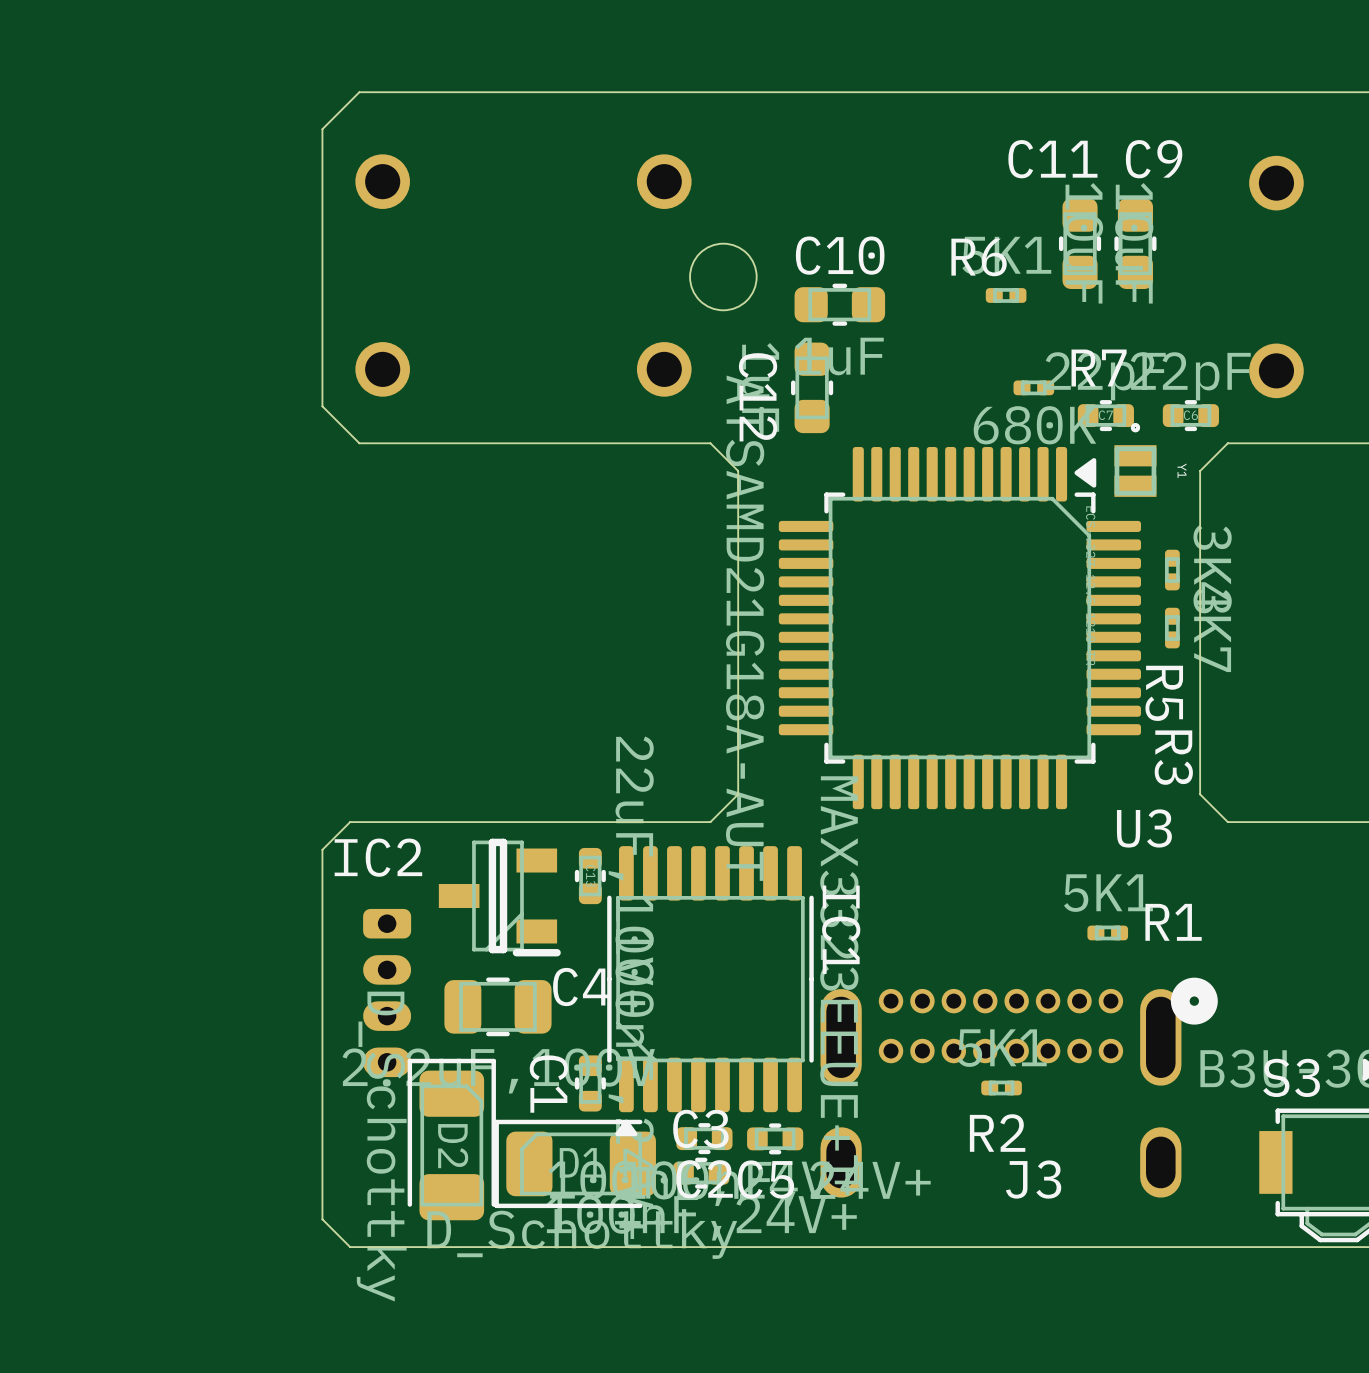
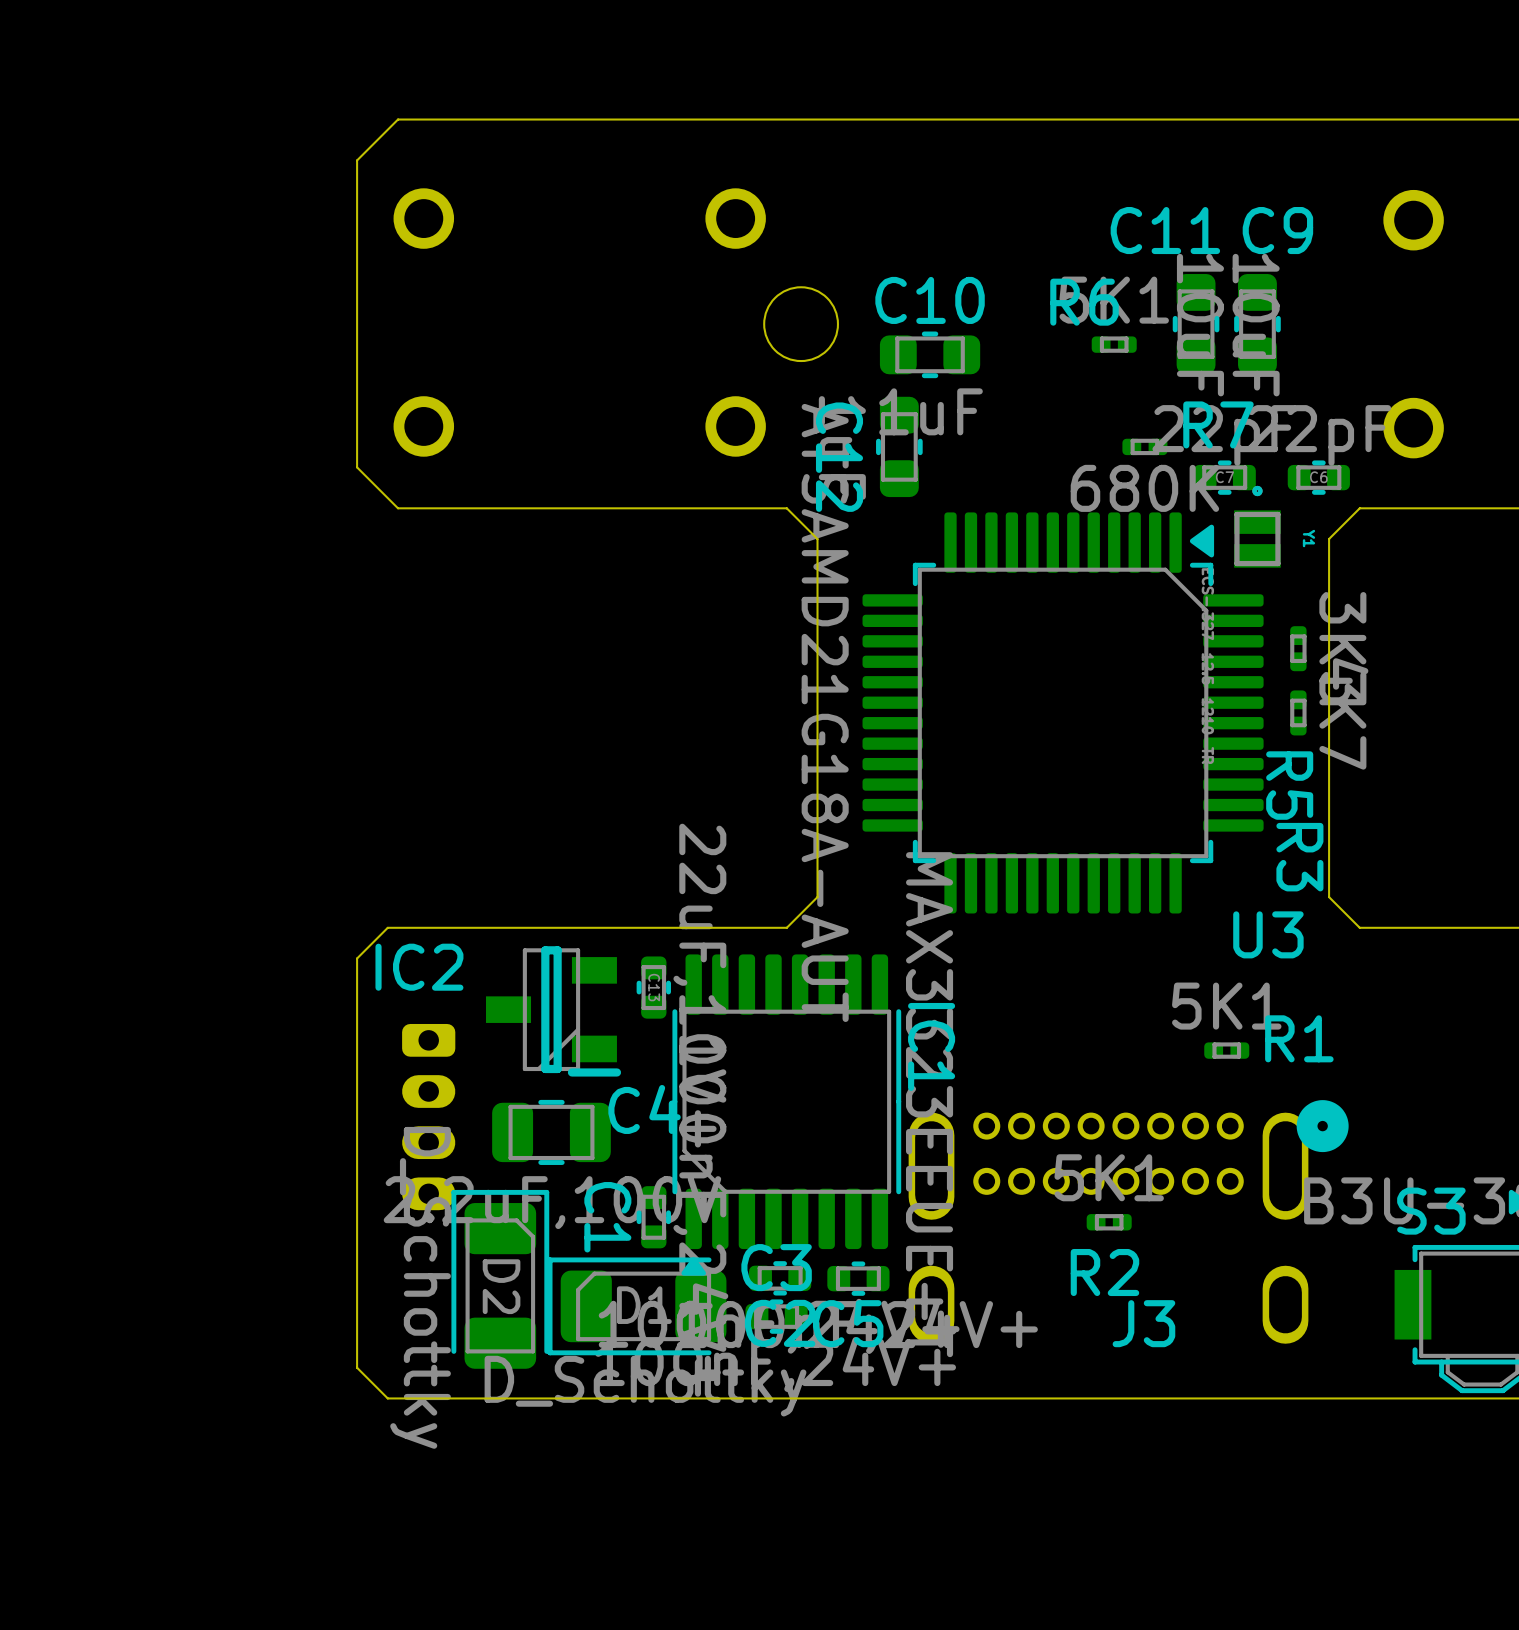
C11 position: (1080, 243) -> (1196, 324)
C9 position: (1135, 243) -> (1257, 324)

